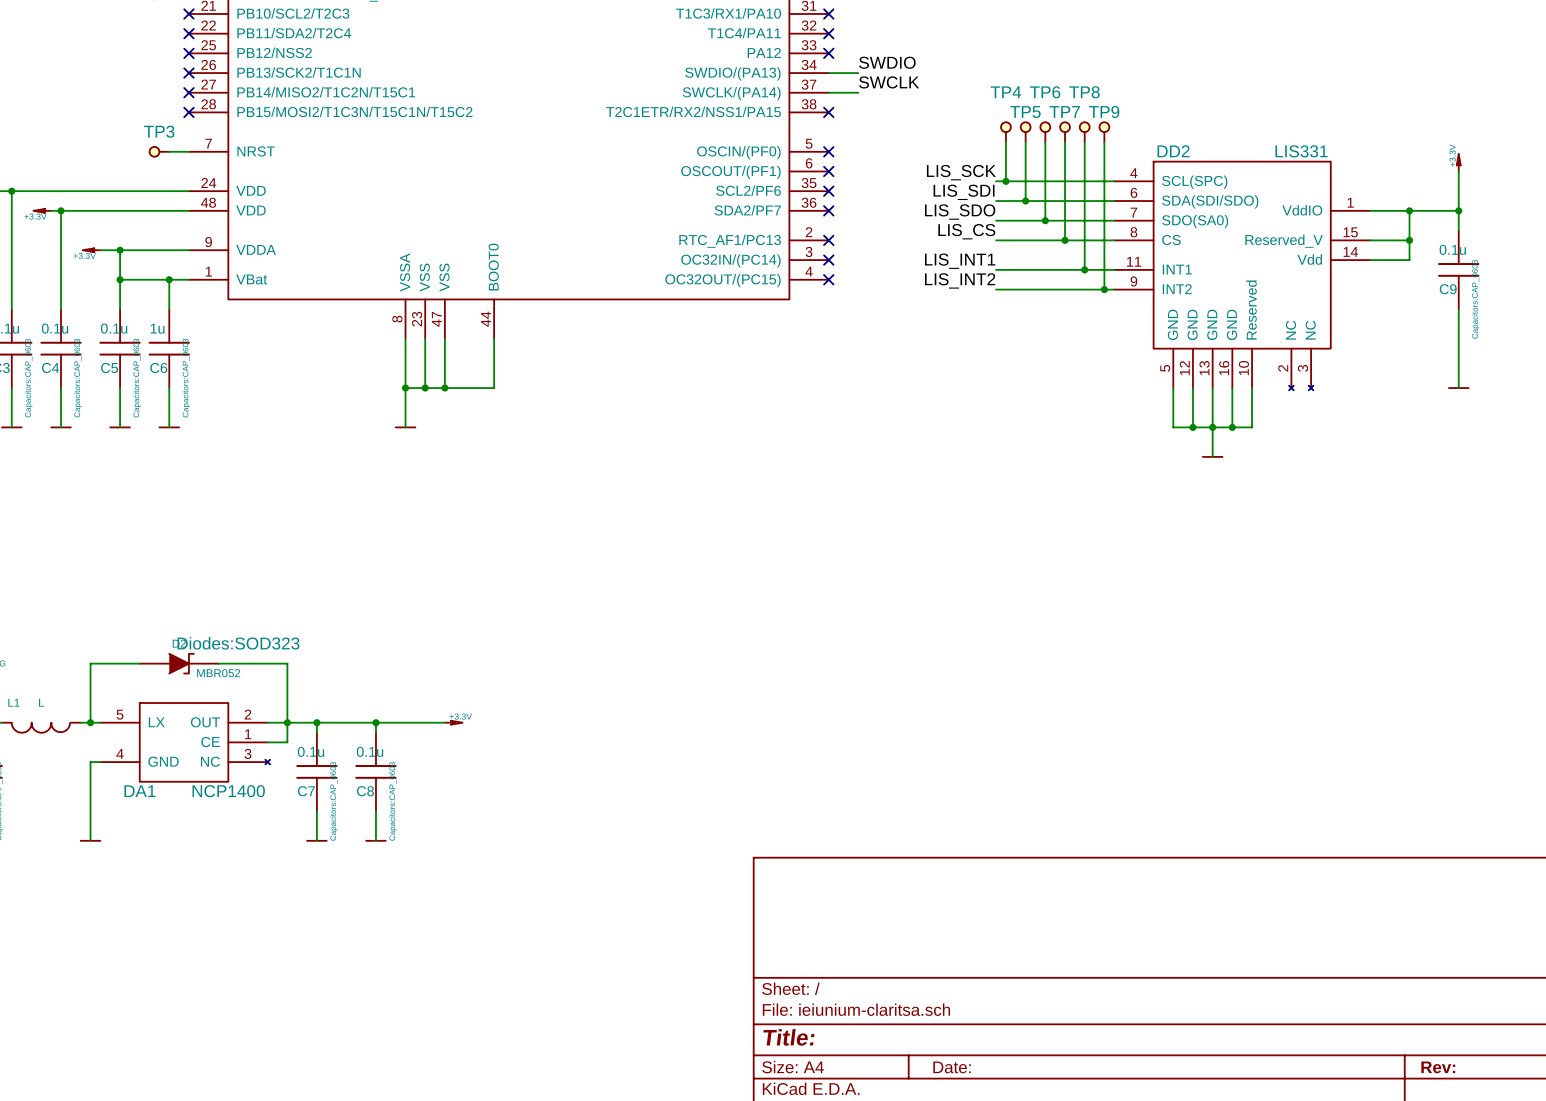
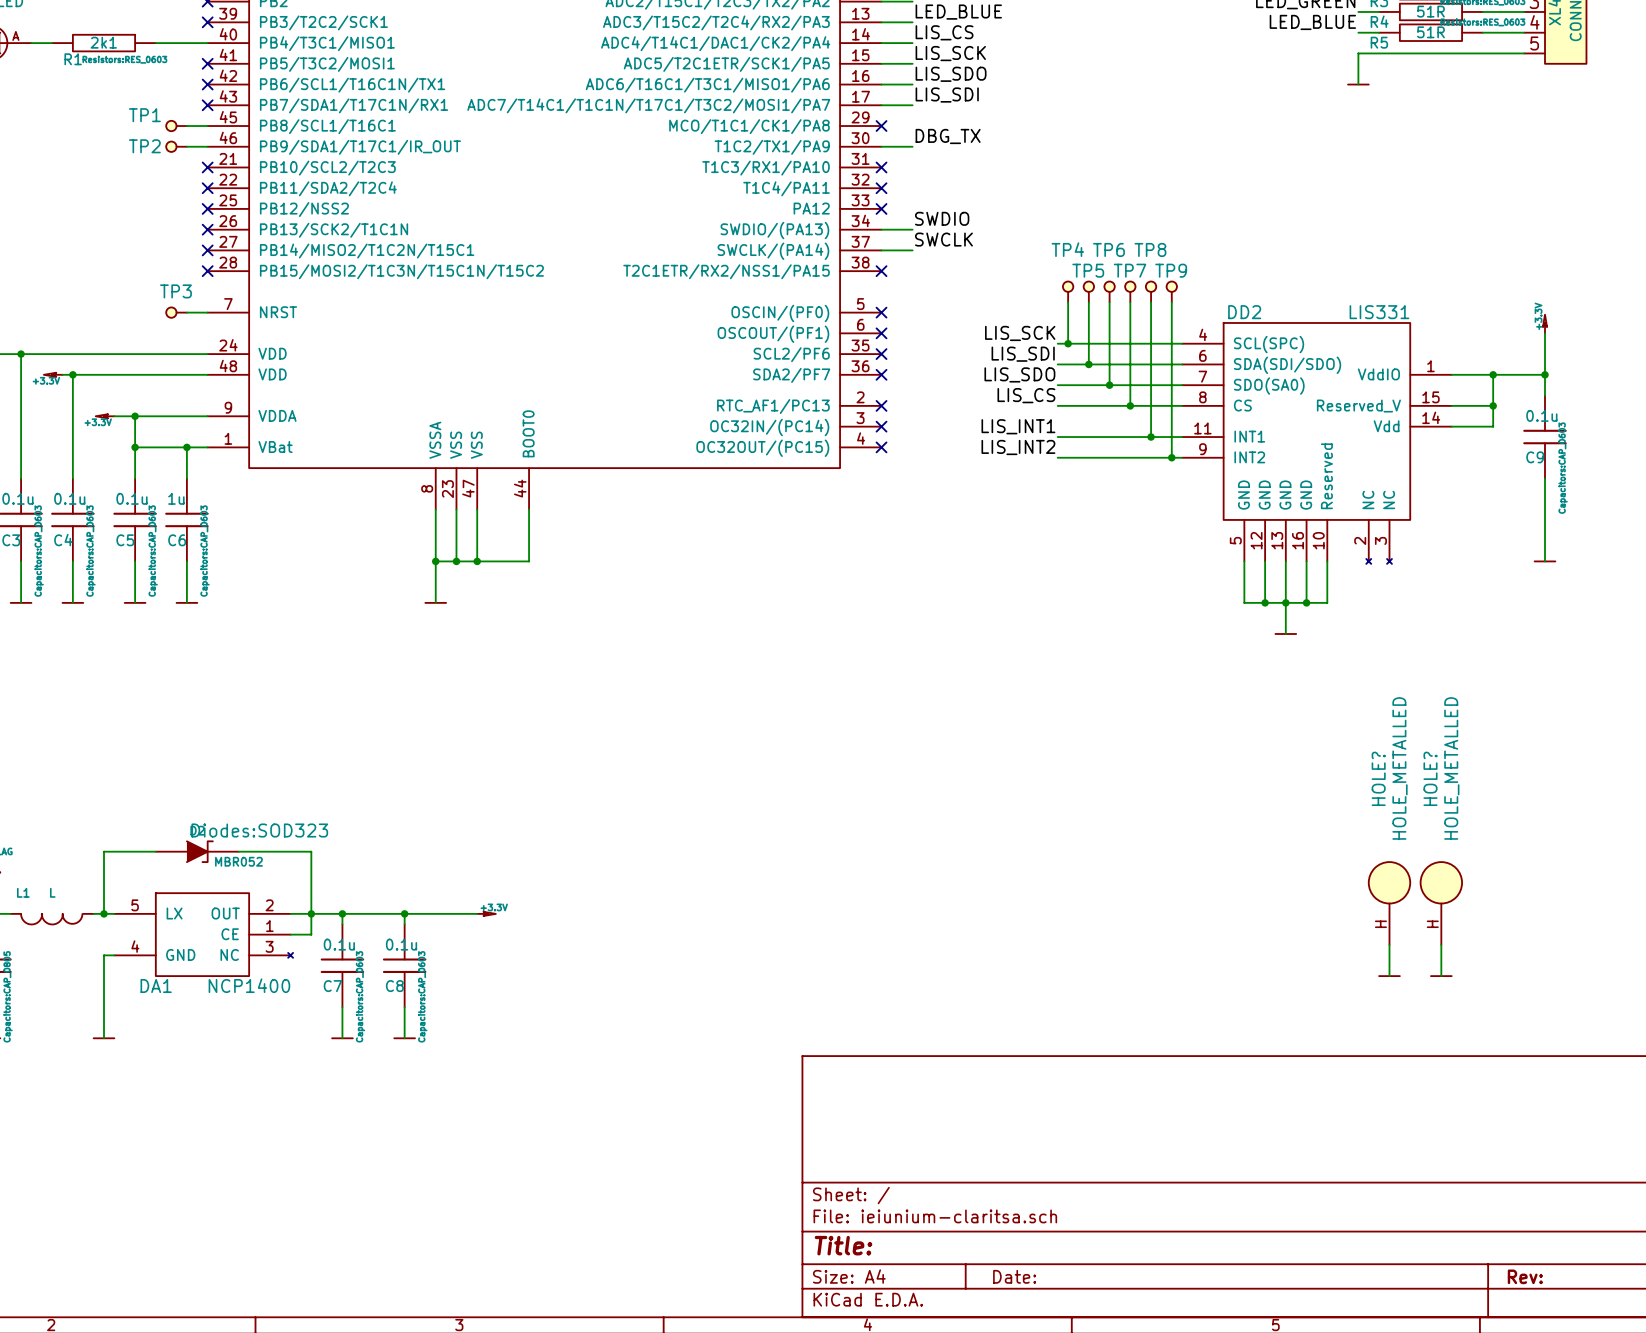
HOLE?: none -> HOLE_METALLED (1389, 903)
HOLE?: none -> HOLE_METALLED (1441, 903)
wire: none -> (1389, 945) (1389, 976)
wire: none -> (1441, 945) (1441, 976)
power symbol: none -> (1389, 976)
power symbol: none -> (1441, 976)

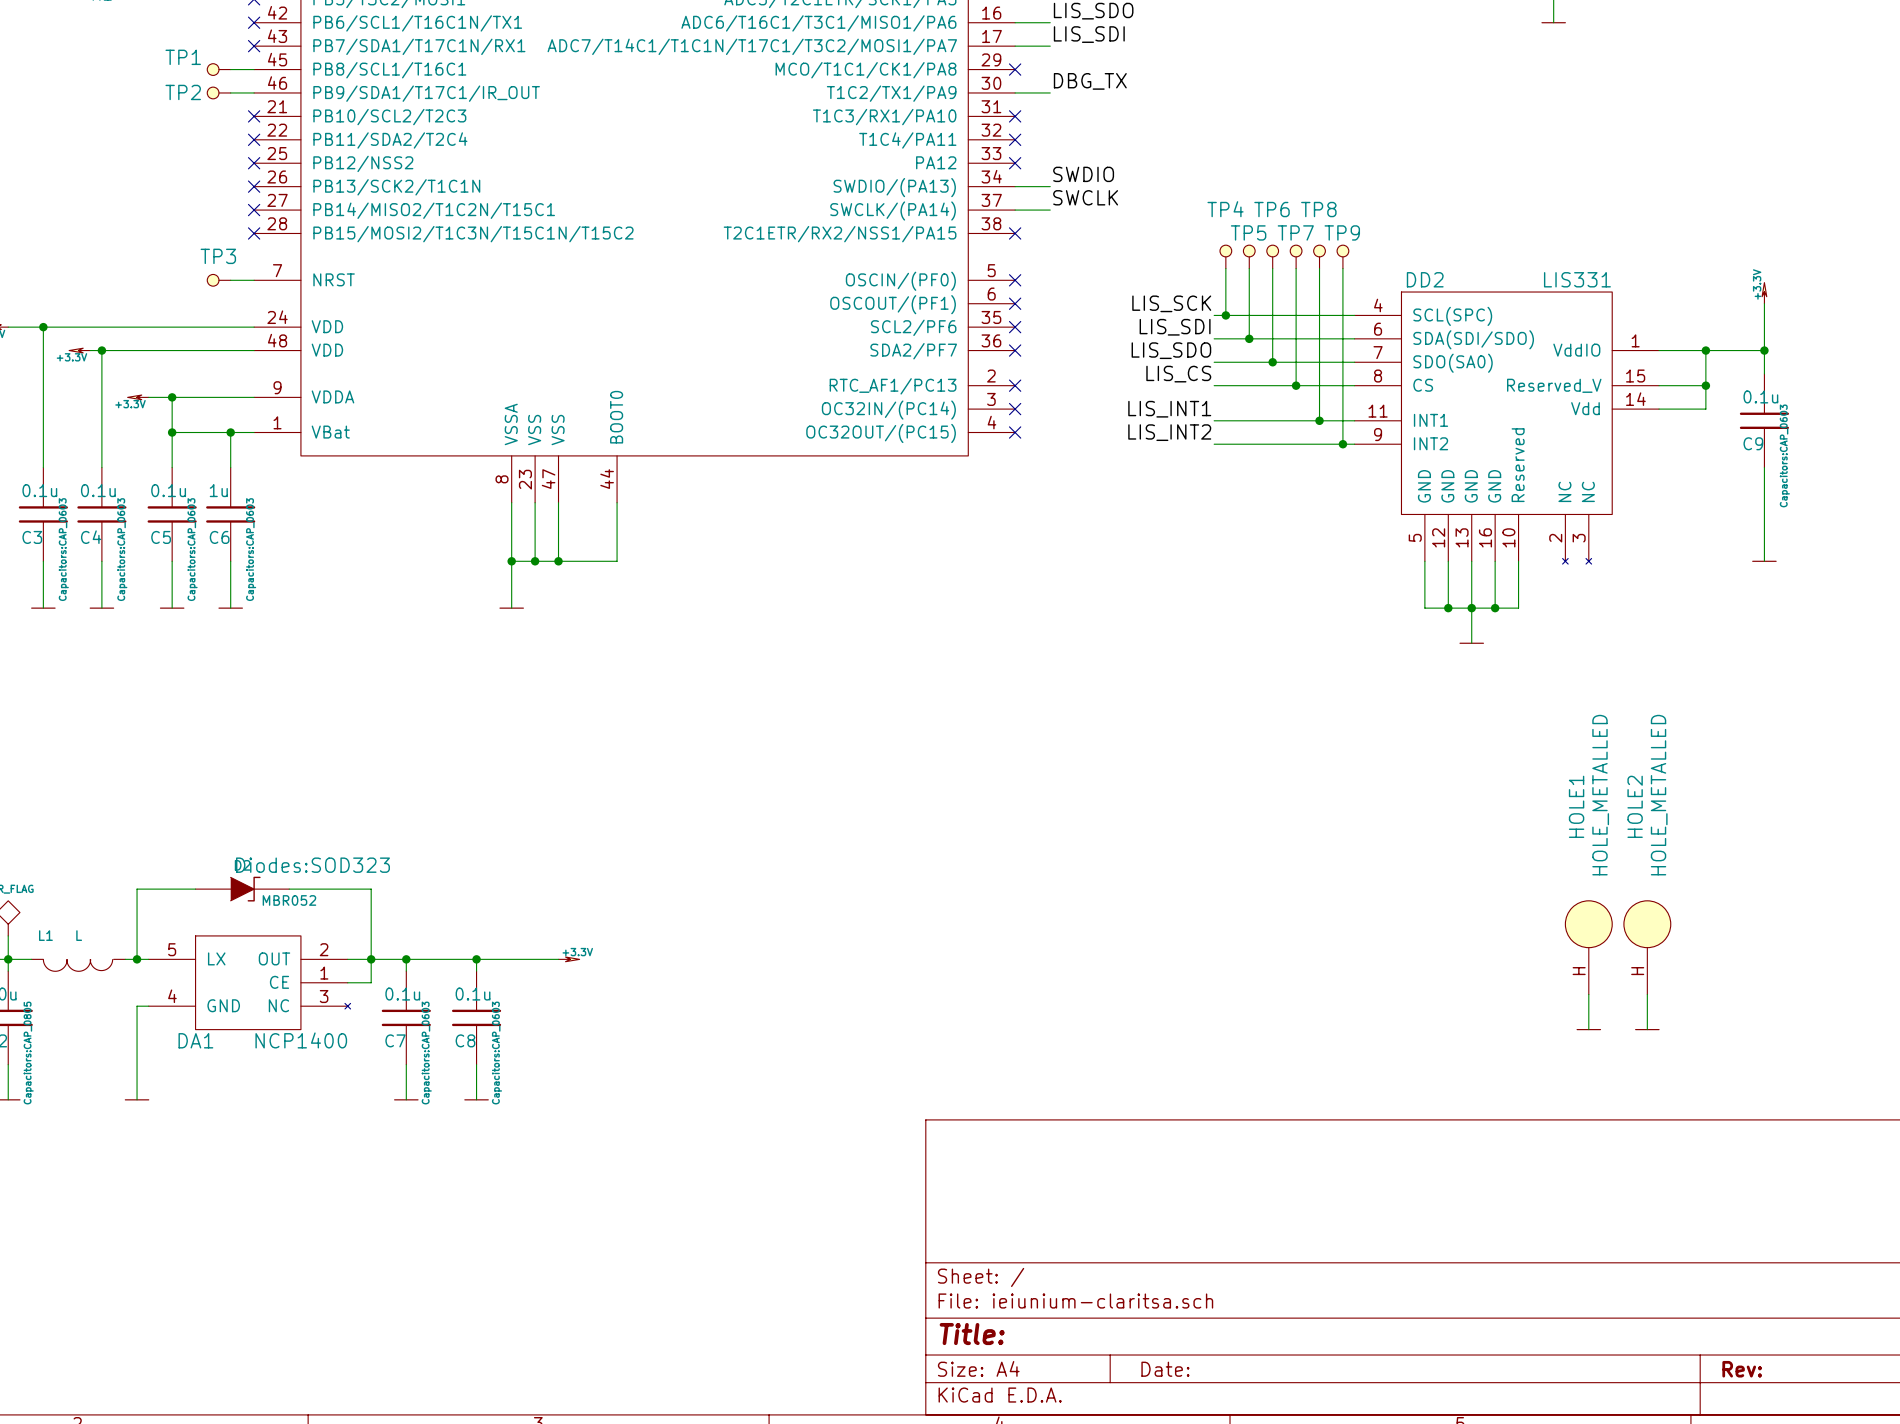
HOLE? name: HOLE? (1378, 778) -> HOLE1 (1576, 806)
HOLE? name: HOLE? (1430, 778) -> HOLE2 (1635, 806)

